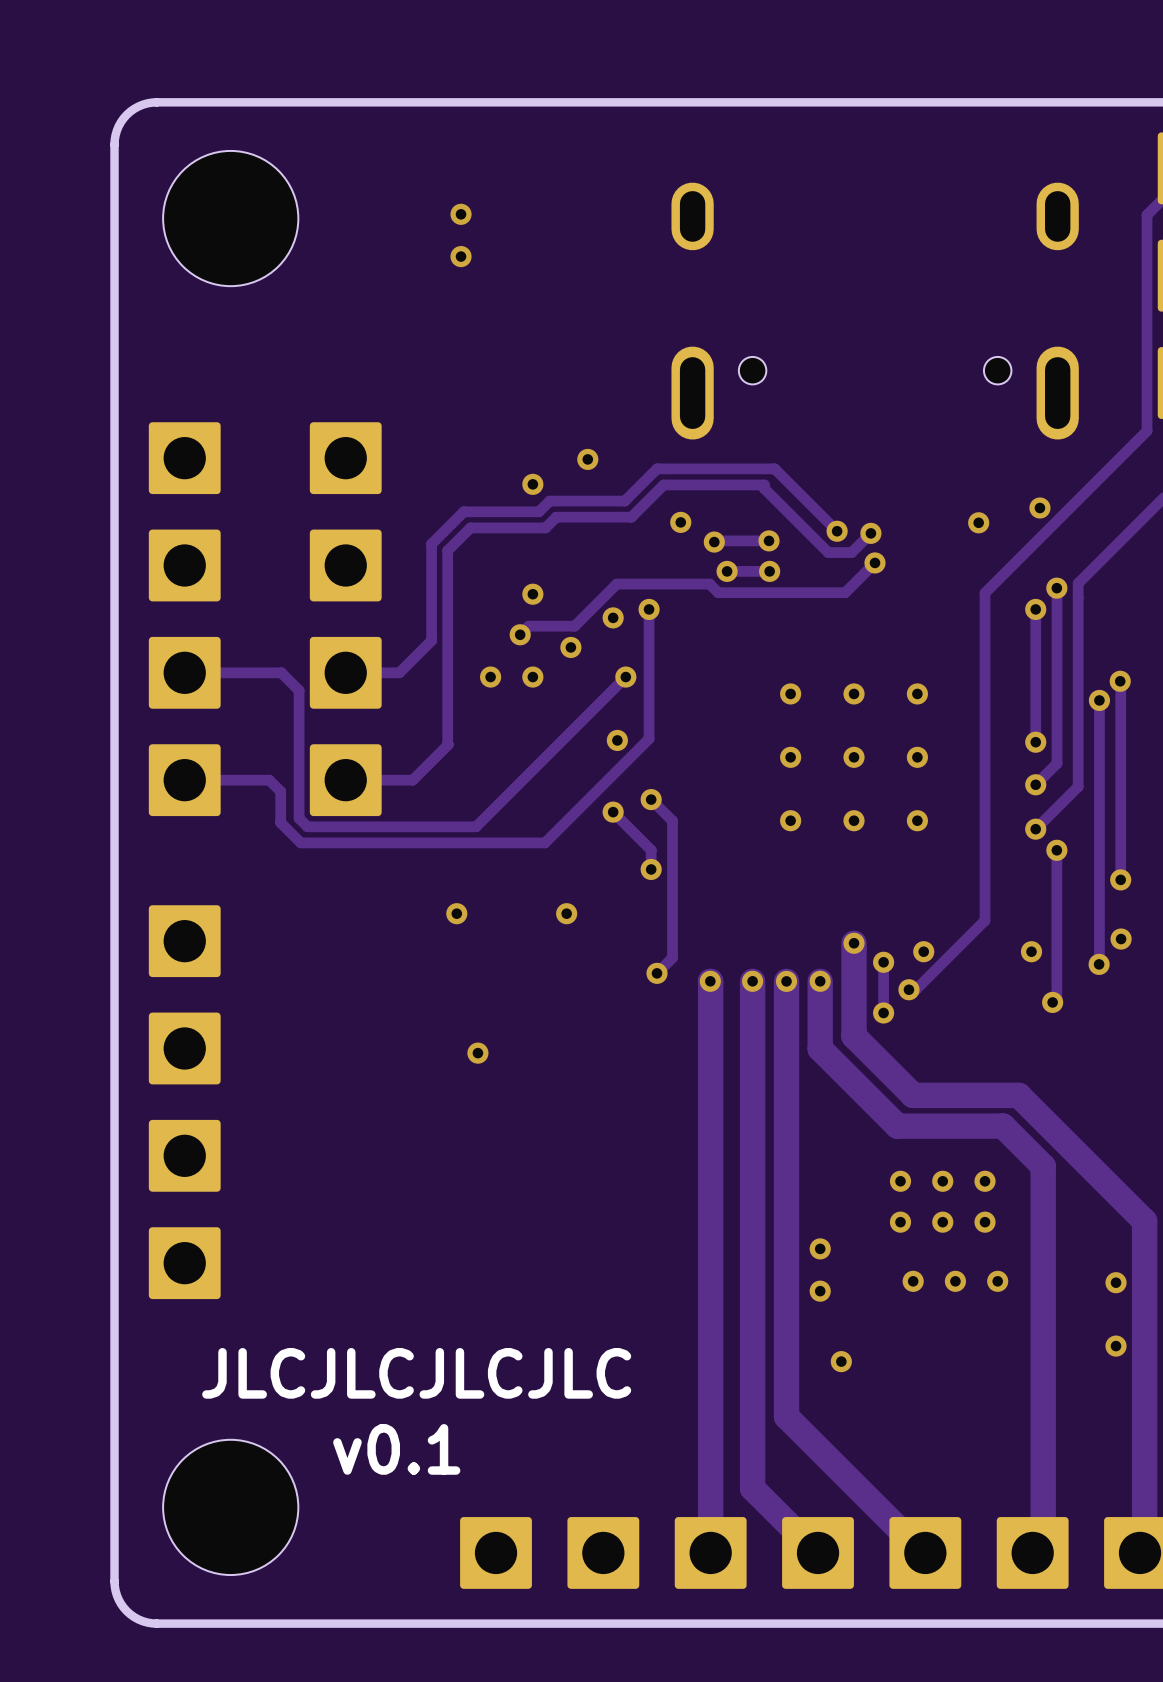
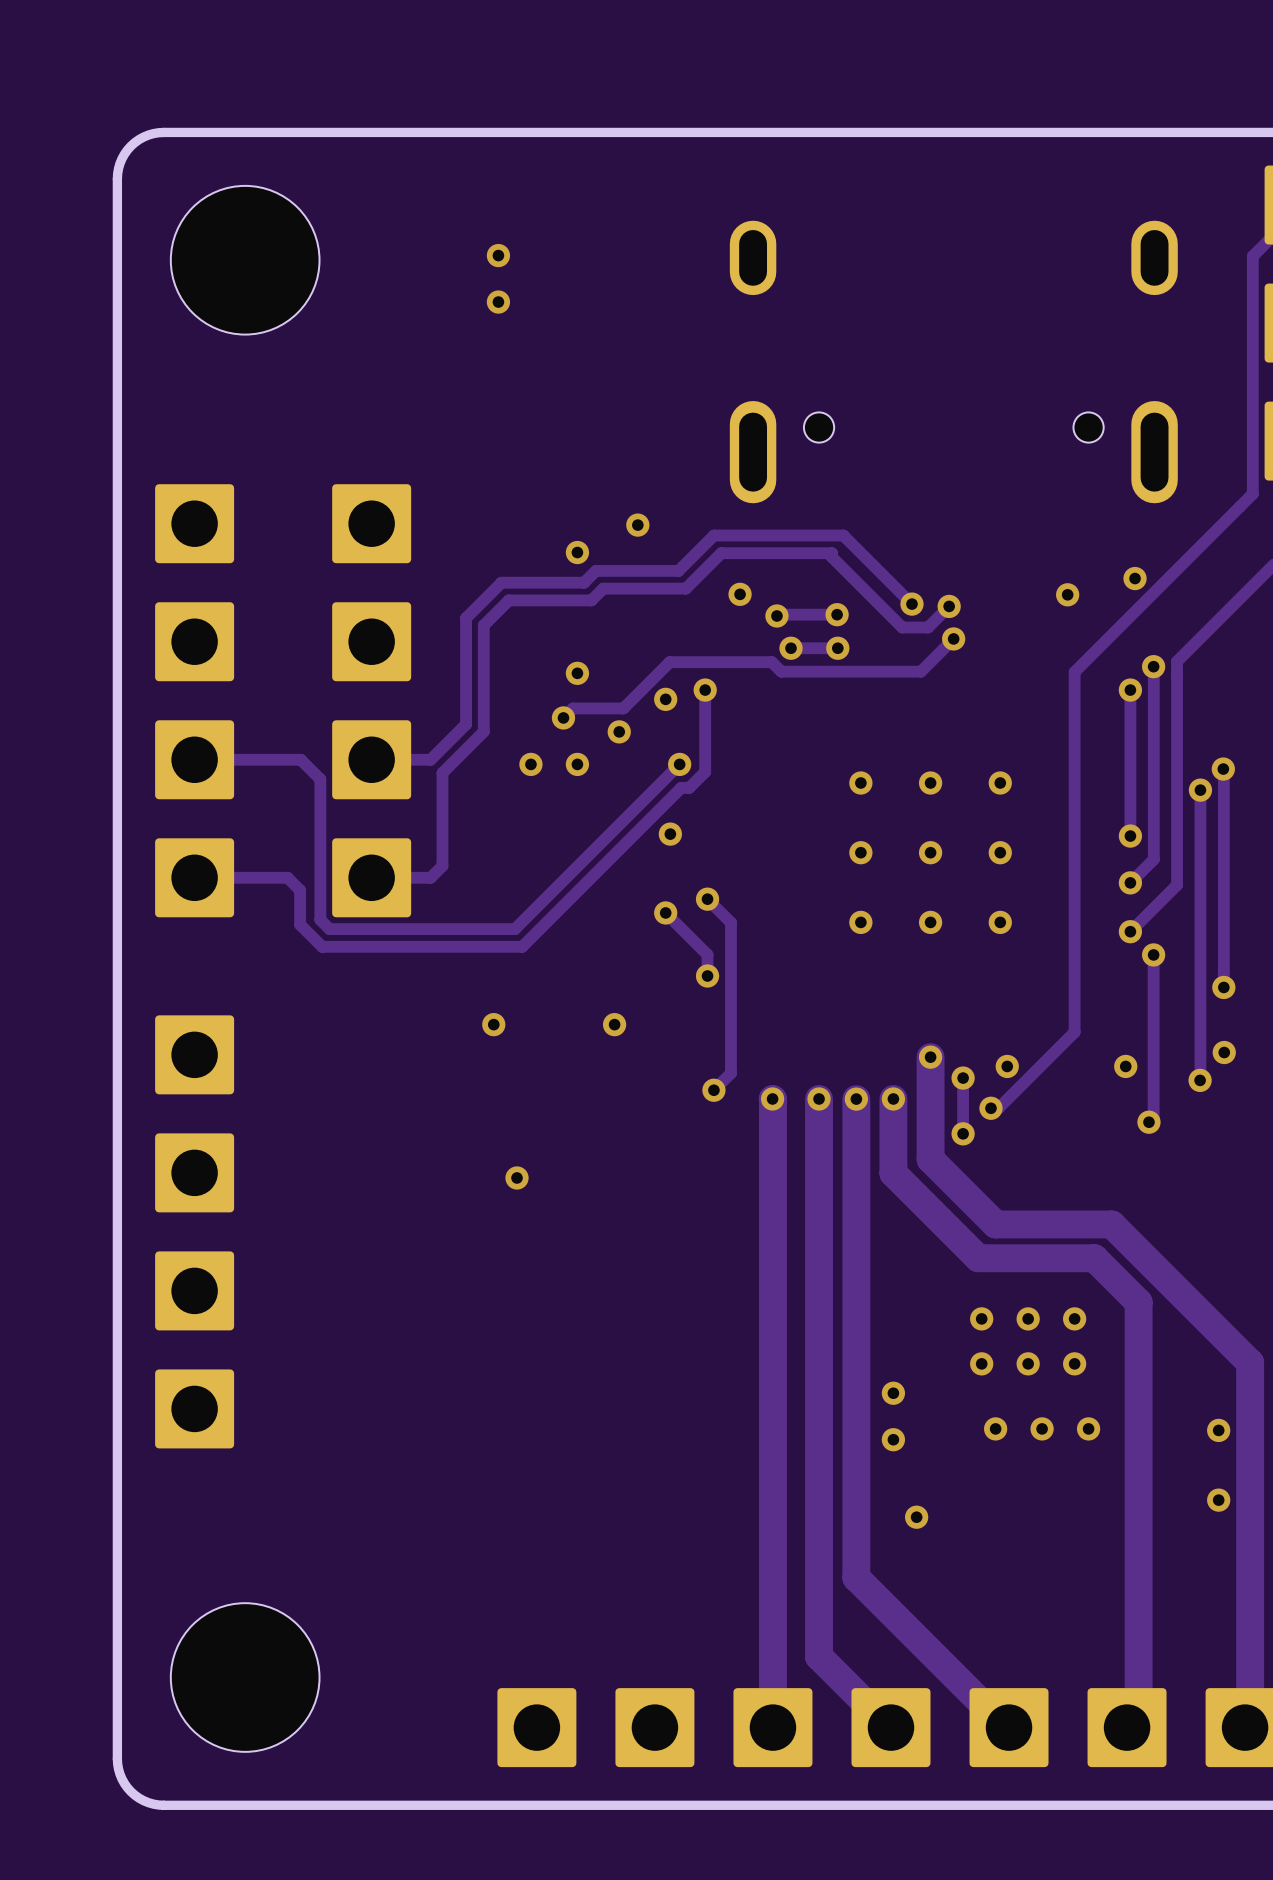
track: (447, 647) (448, 744) (412, 780) (399, 780) -> (483, 731) (442, 773) (442, 865) (430, 877)
track: (649, 683) (649, 738) (545, 842) (482, 842) -> (705, 771) (689, 787) (681, 787) (522, 946)
text: JLCJLCJLCJLC (416, 1373) -> none
text: v0.1 (396, 1449) -> none

